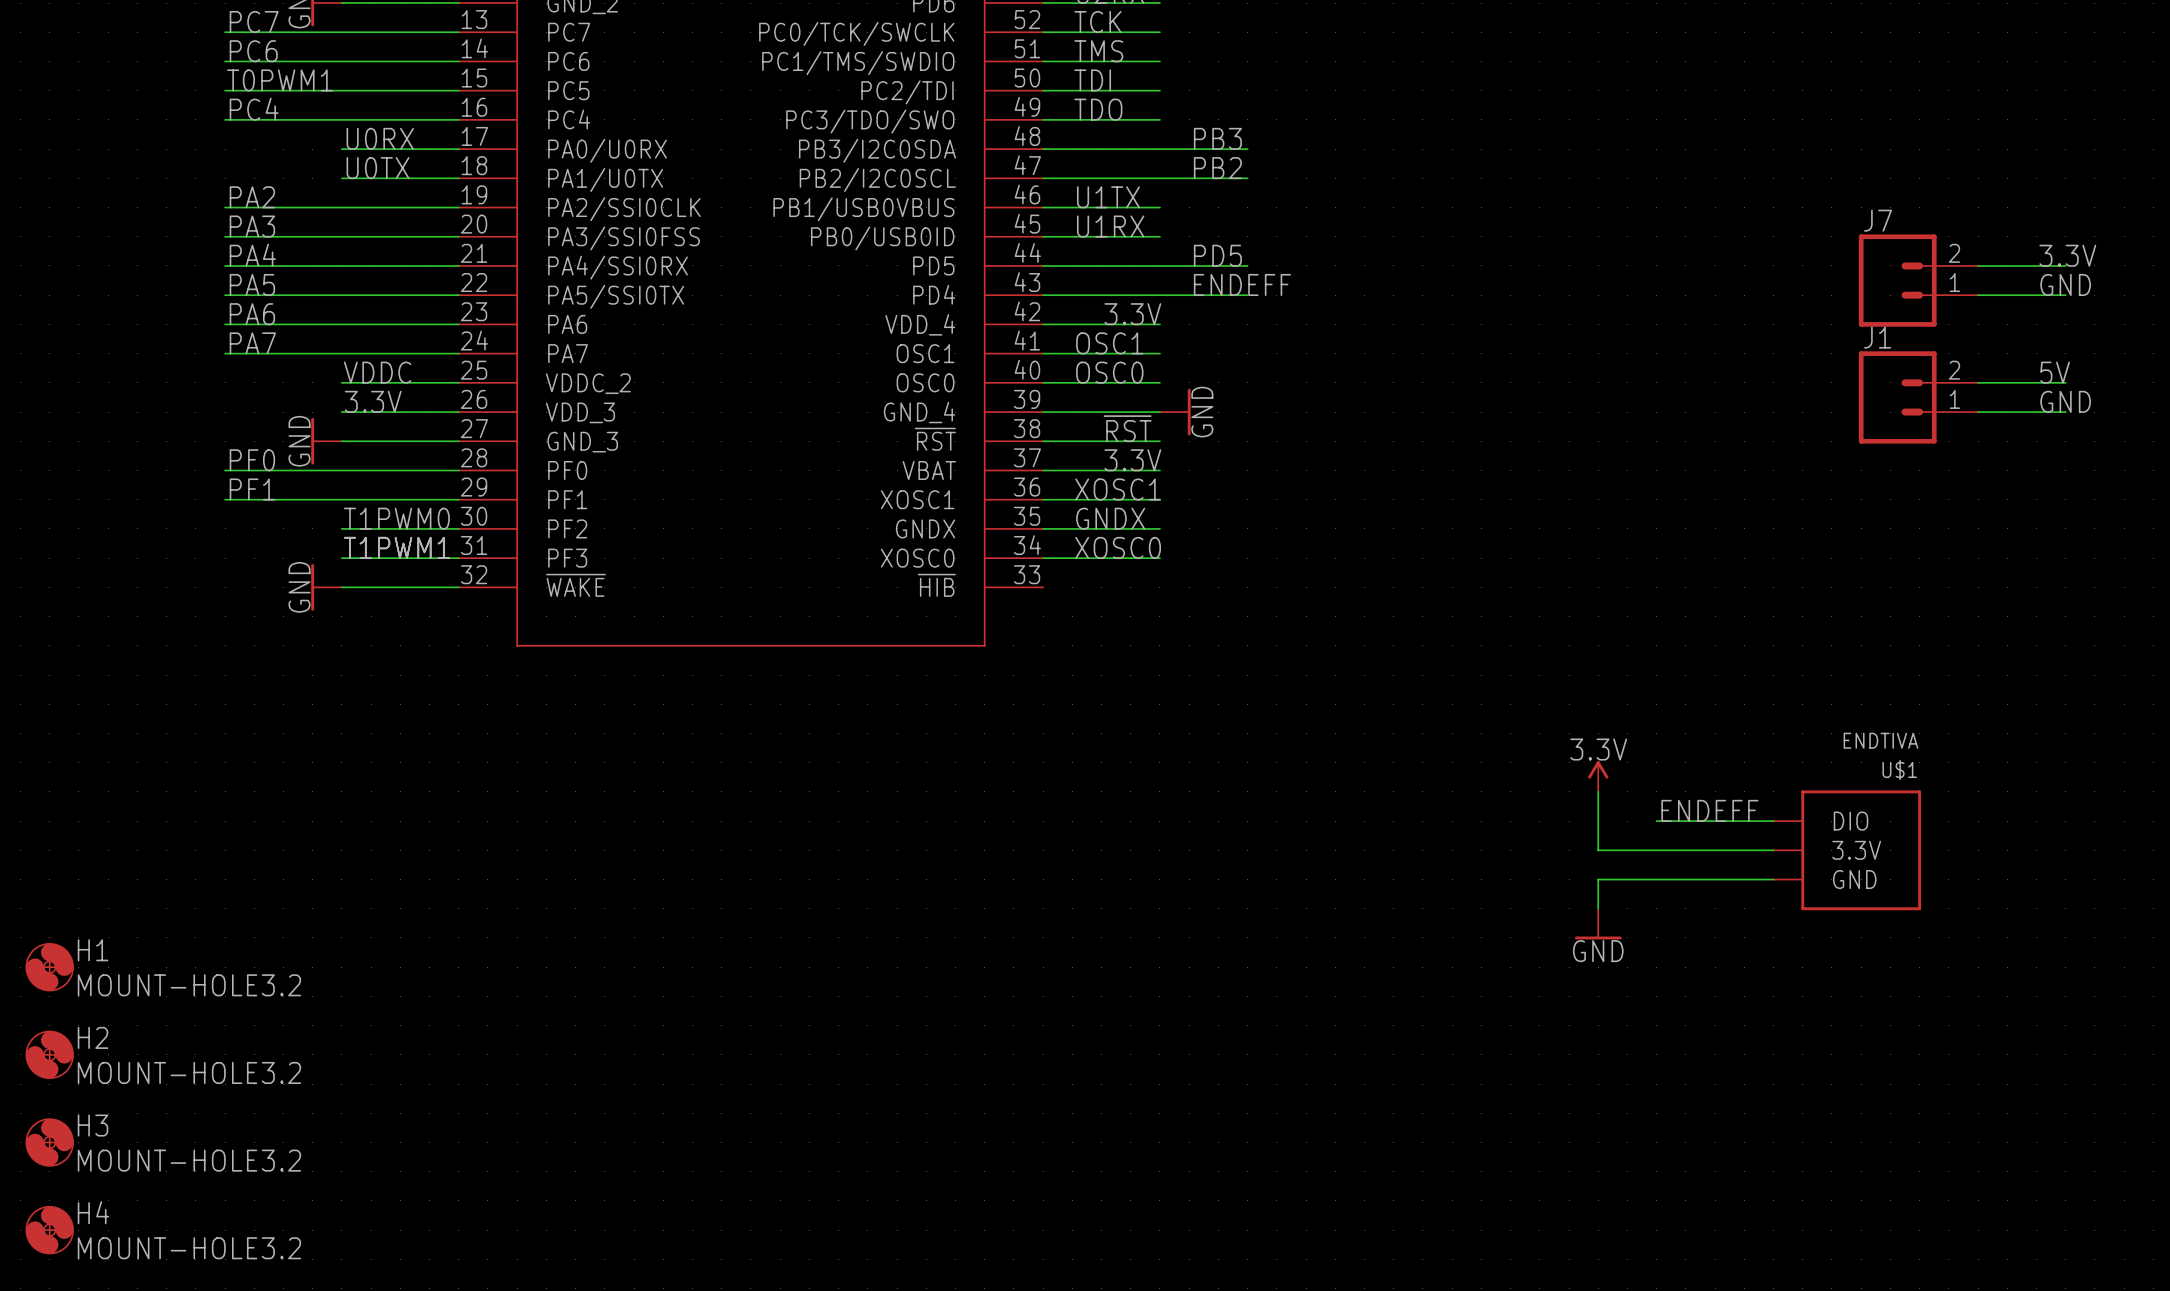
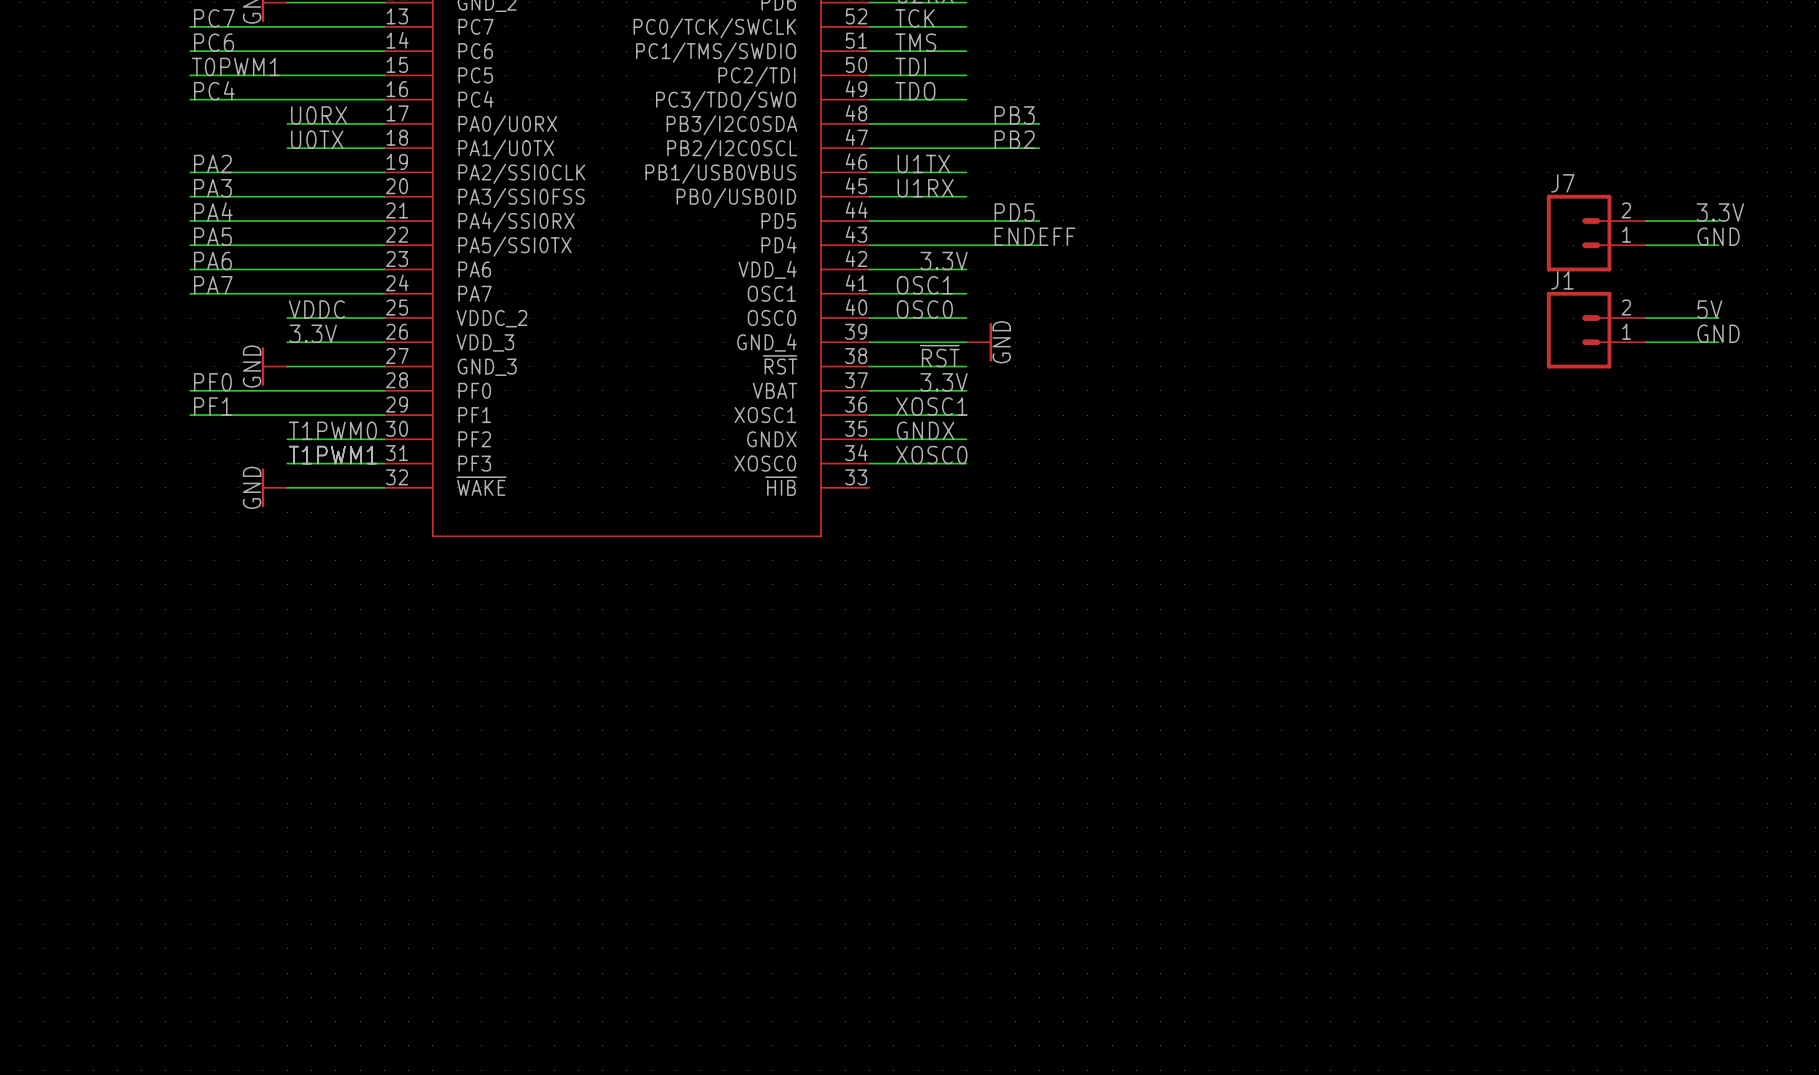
power symbol: 3.3V (1598, 776) -> none
wire: (1598, 791) (1598, 850) (1773, 850) -> none
label: ENDEFF (1709, 810) -> none
wire: (1656, 821) (1773, 821) -> none
U$1: ENDTIVA (1847, 850) -> none
wire: (1773, 879) (1598, 879) (1598, 908) -> none
power symbol: GND (1598, 924) -> none
H1: MOUNT-HOLE3.2 (49, 967) -> none
H2: MOUNT-HOLE3.2 (49, 1054) -> none
H3: MOUNT-HOLE3.2 (49, 1142) -> none
H4: MOUNT-HOLE3.2 (49, 1230) -> none

